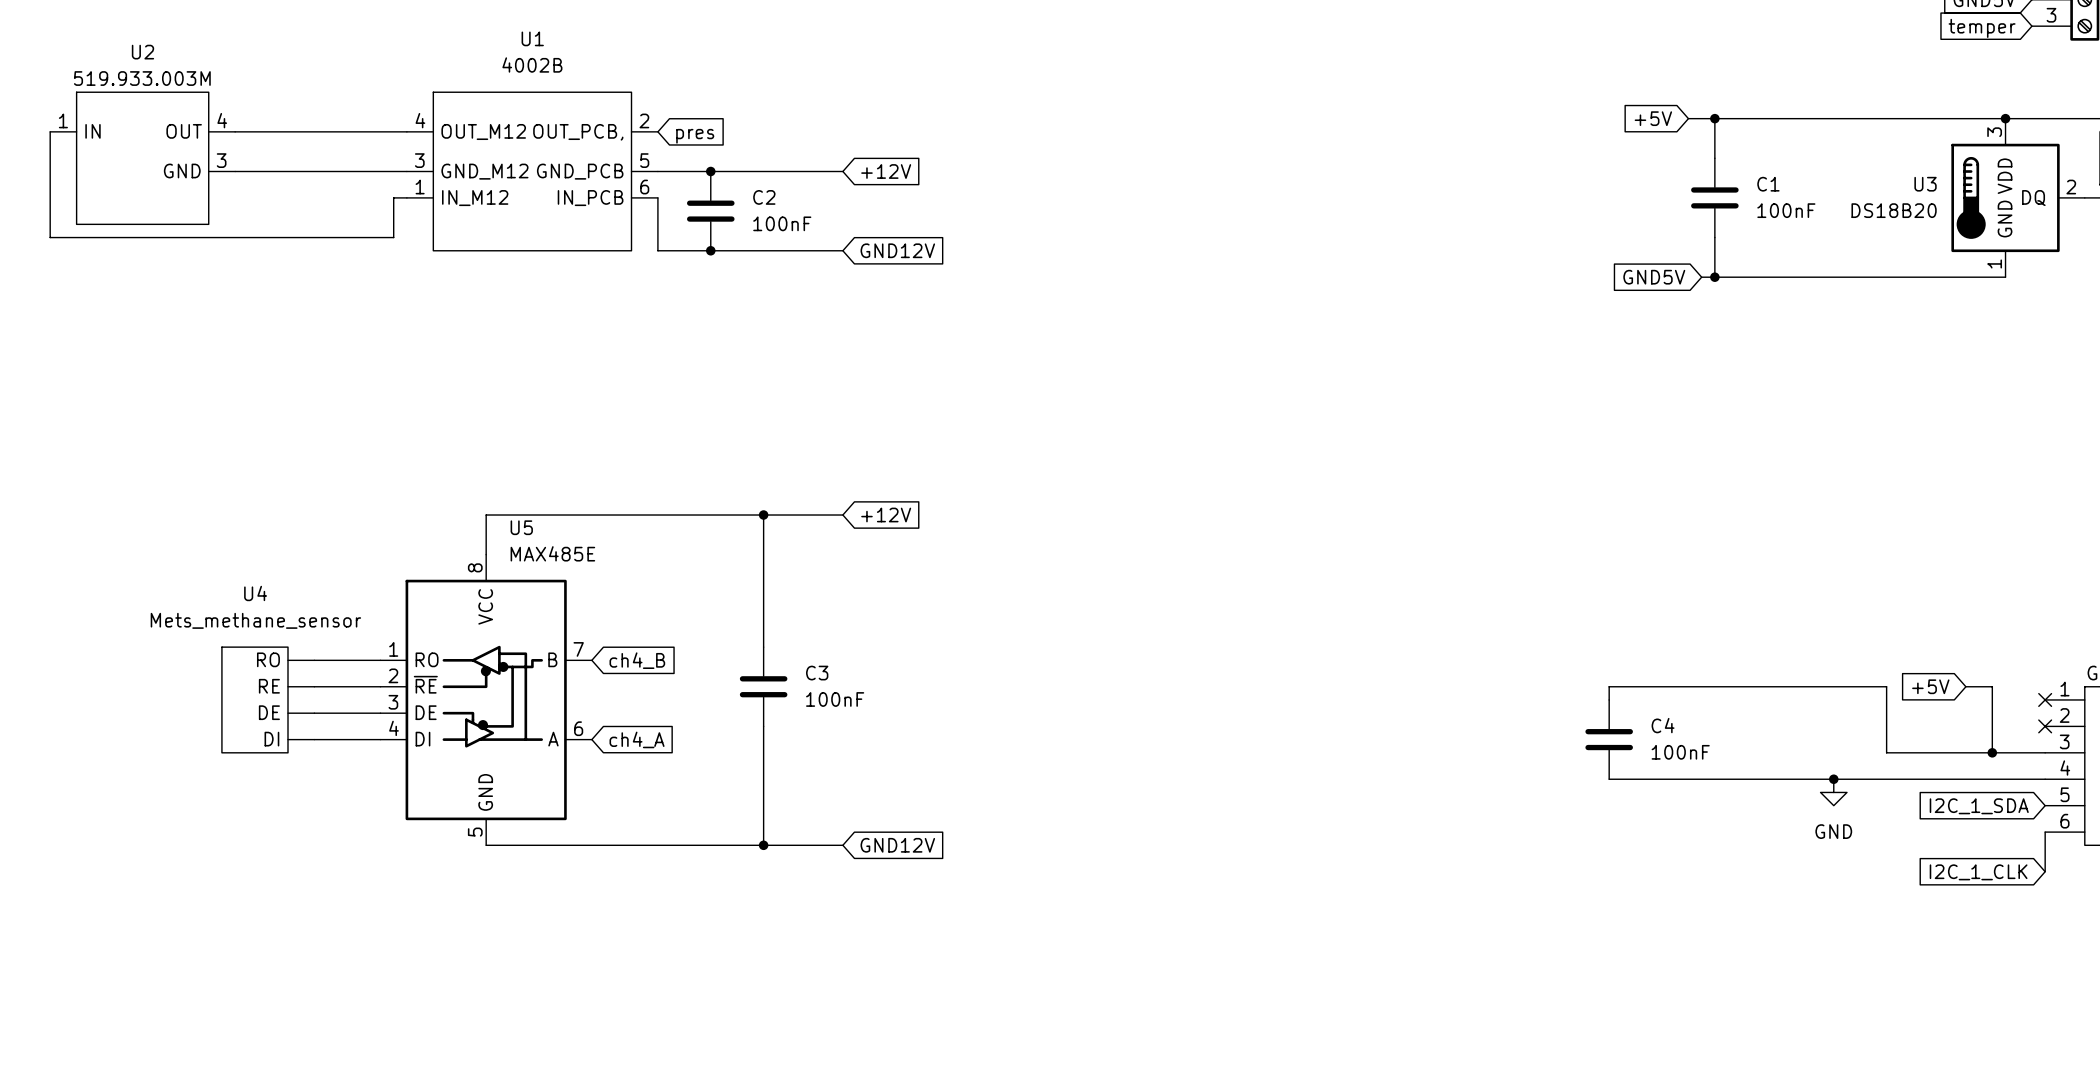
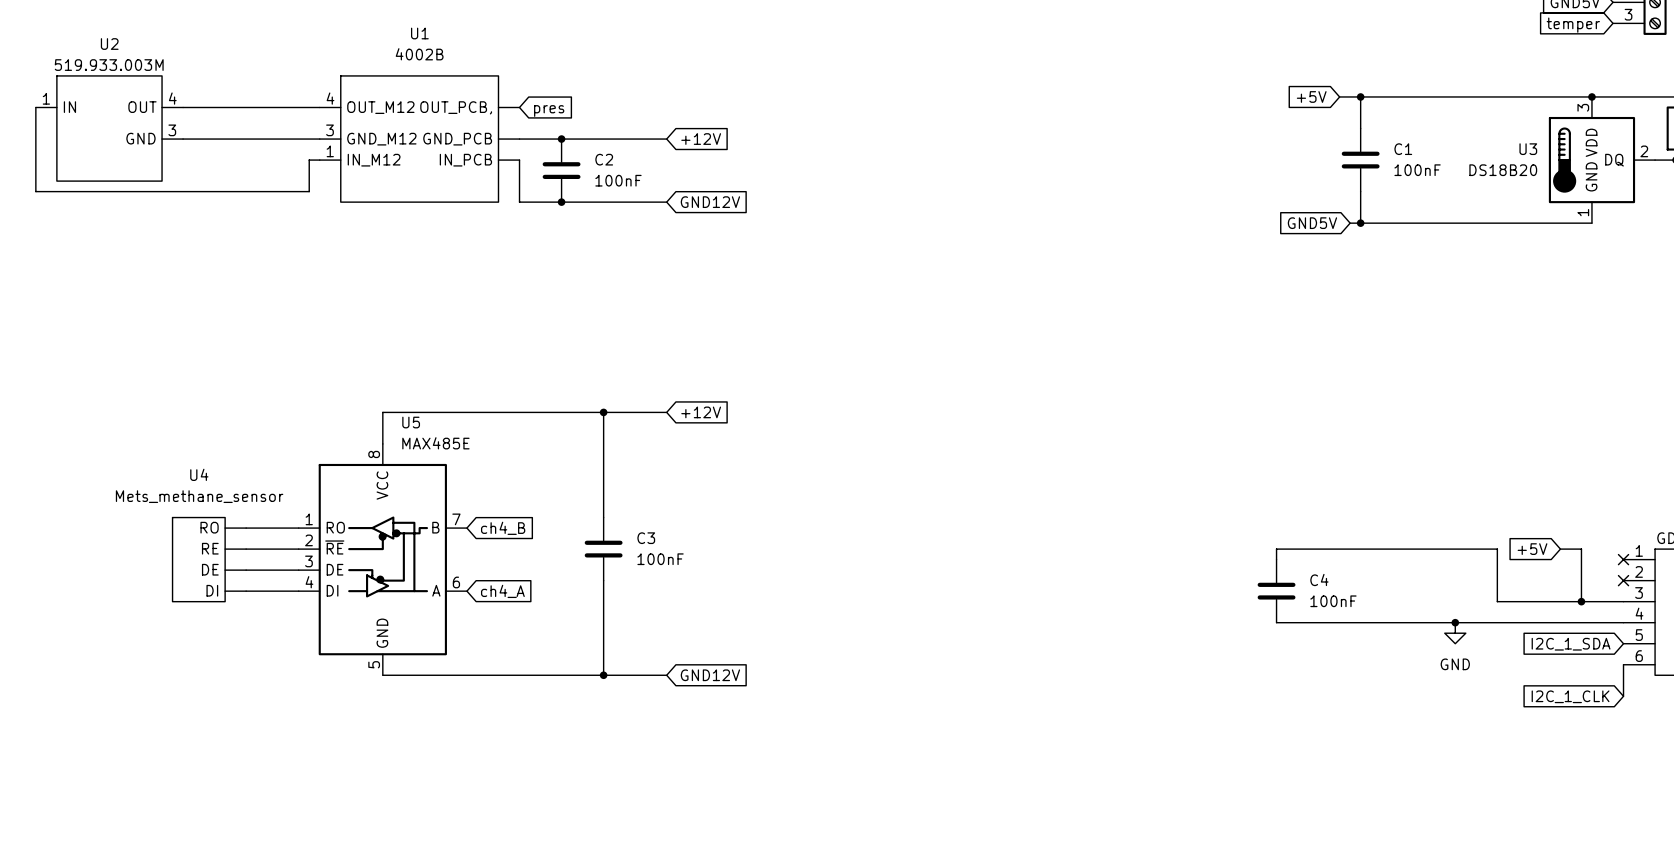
U1 pin number: 2 (644, 120) -> none
U1 pin number: 5 (644, 160) -> none
U1 pin number: 6 (644, 187) -> none

